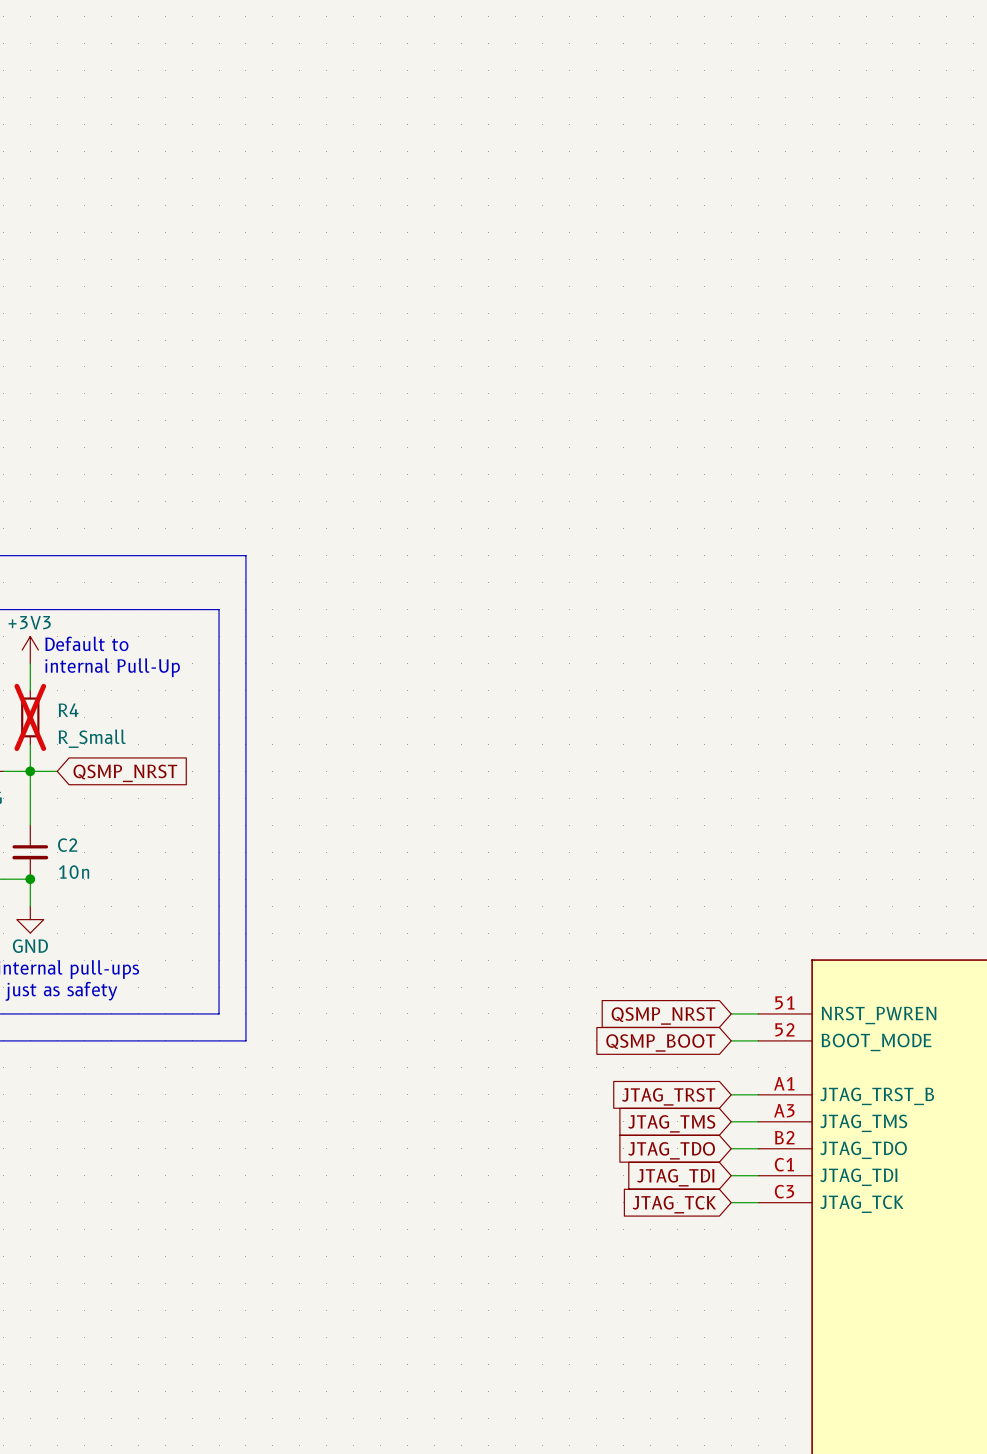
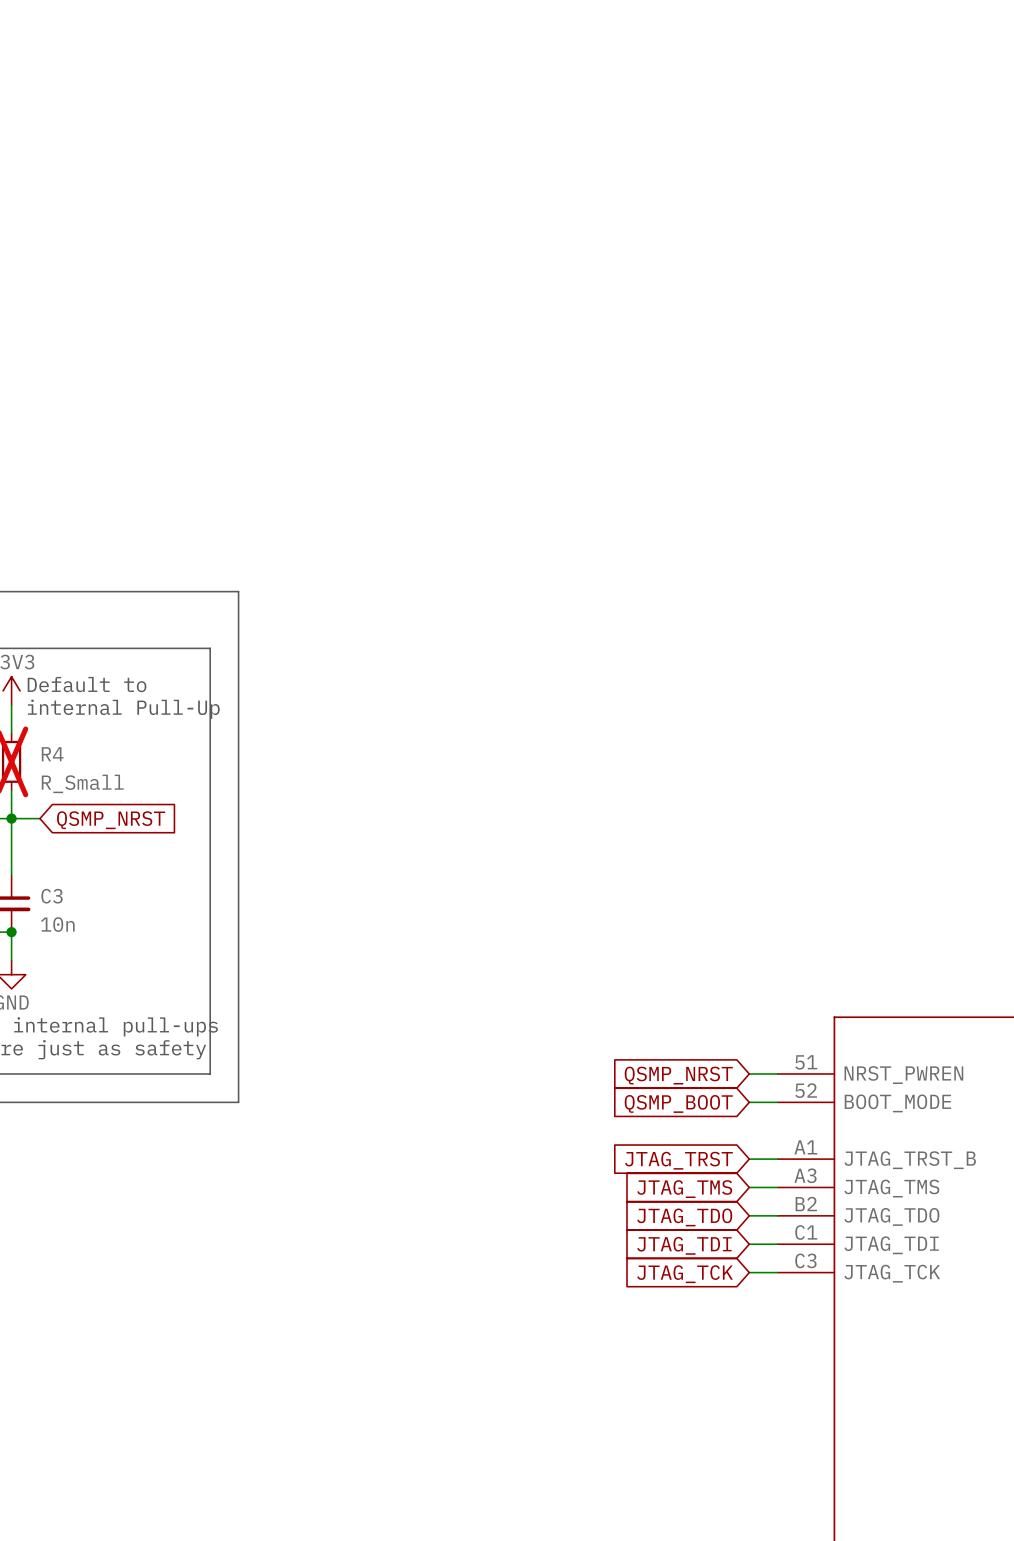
C2 name: C2 (67, 845) -> C3 (52, 896)

